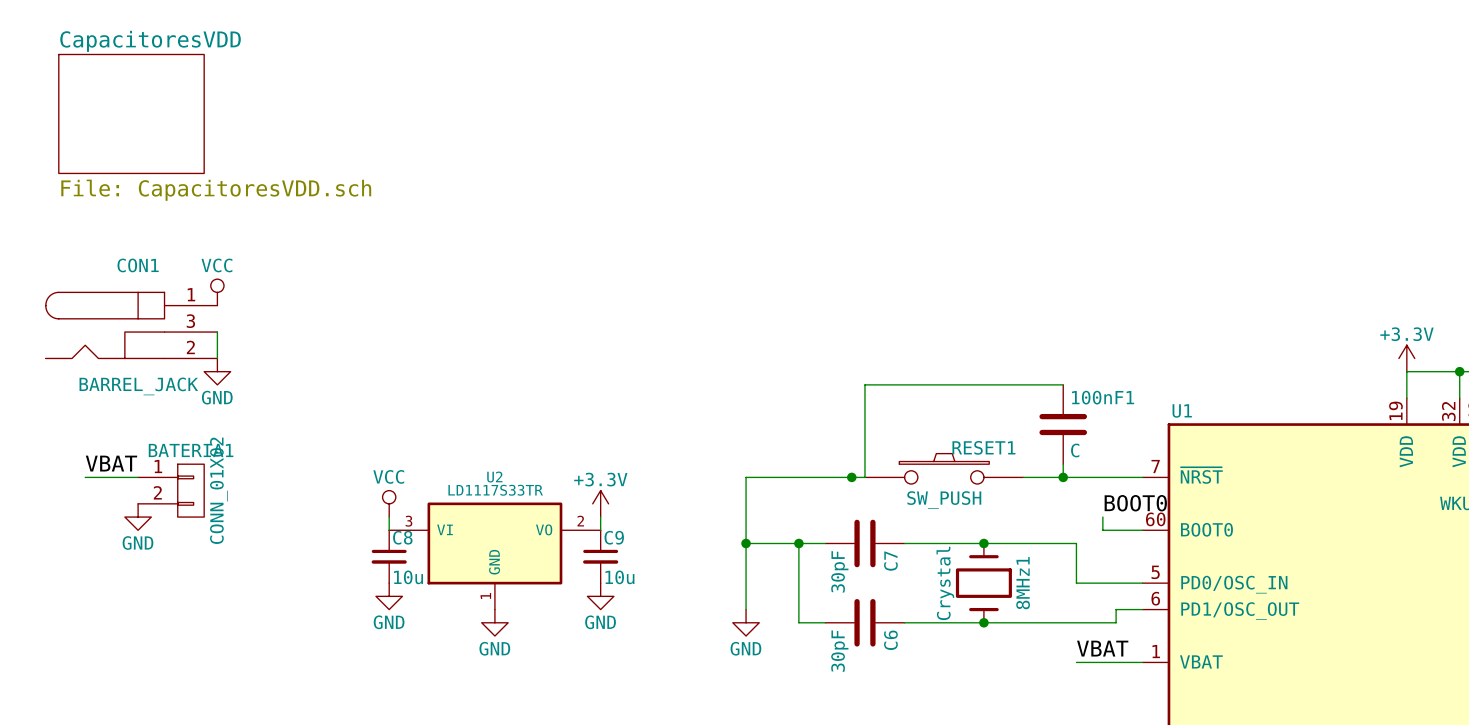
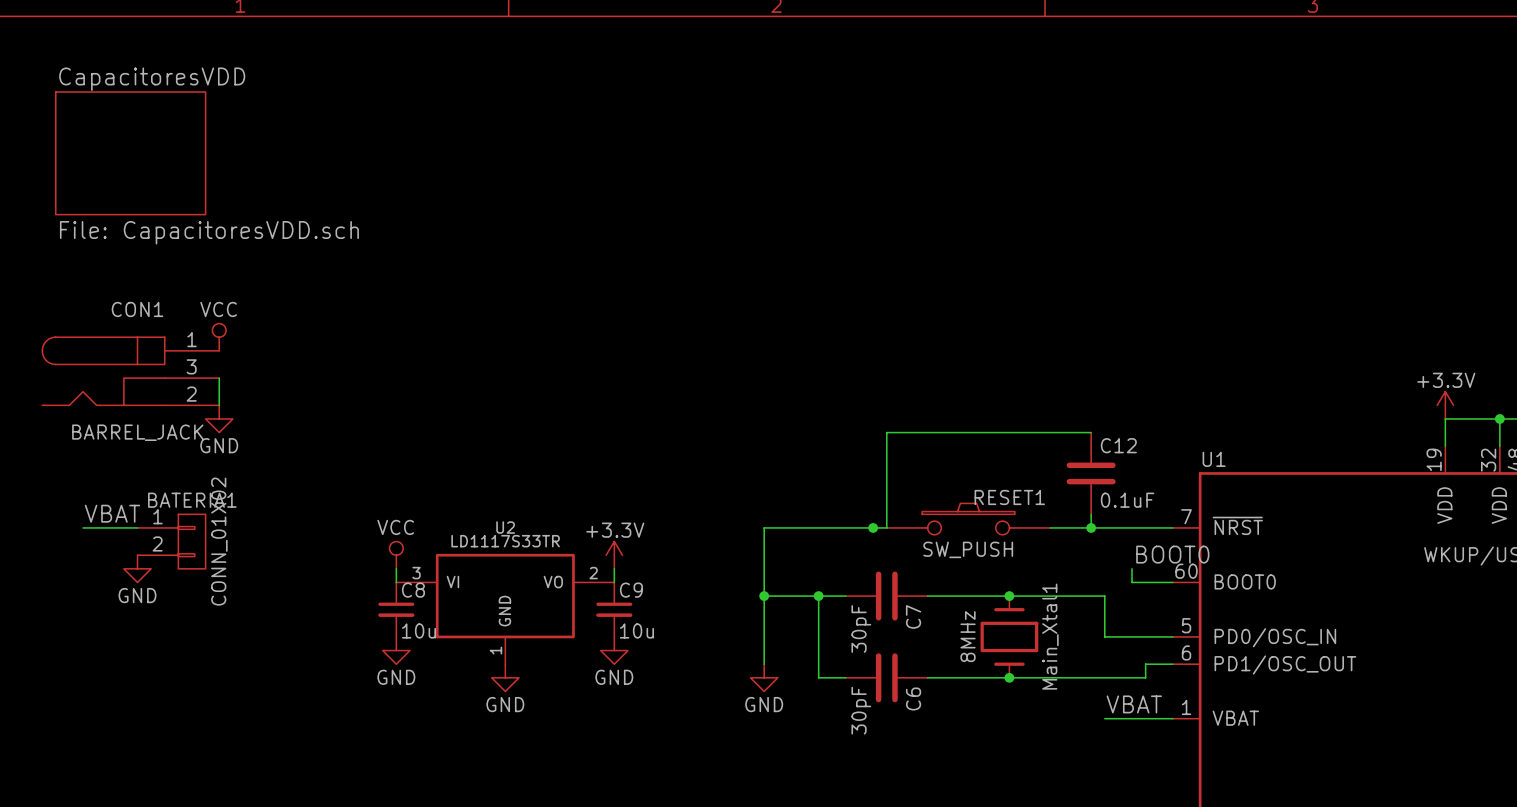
100nF1 name: 100nF1 (1103, 397) -> C12 (1118, 445)
100nF1 value: C (1075, 450) -> 0.1uF (1127, 500)
8MHz1 value: Crystal (945, 583) -> 8MHz (968, 636)
8MHz1 name: 8MHz1 (1023, 583) -> Main_Xtal1 (1050, 636)

